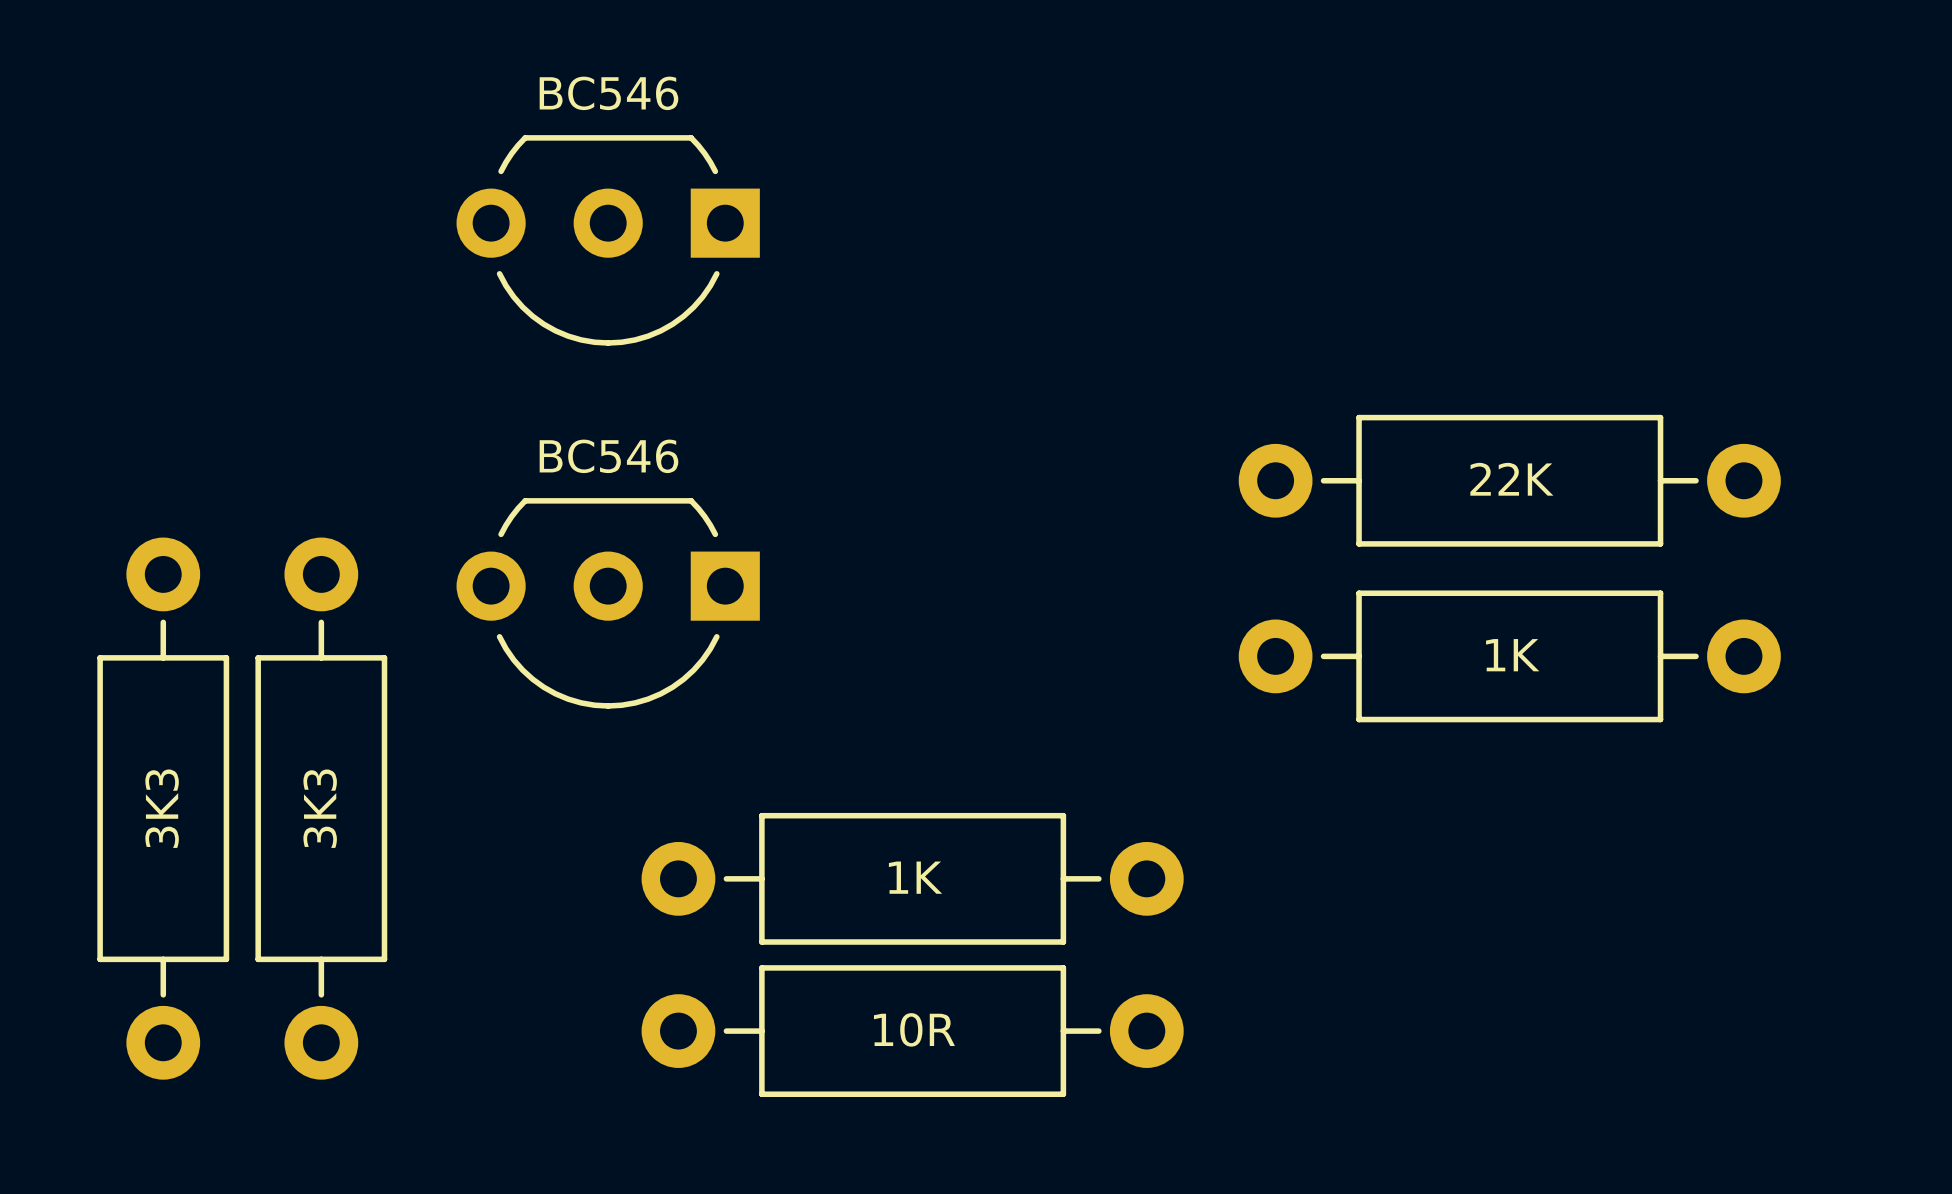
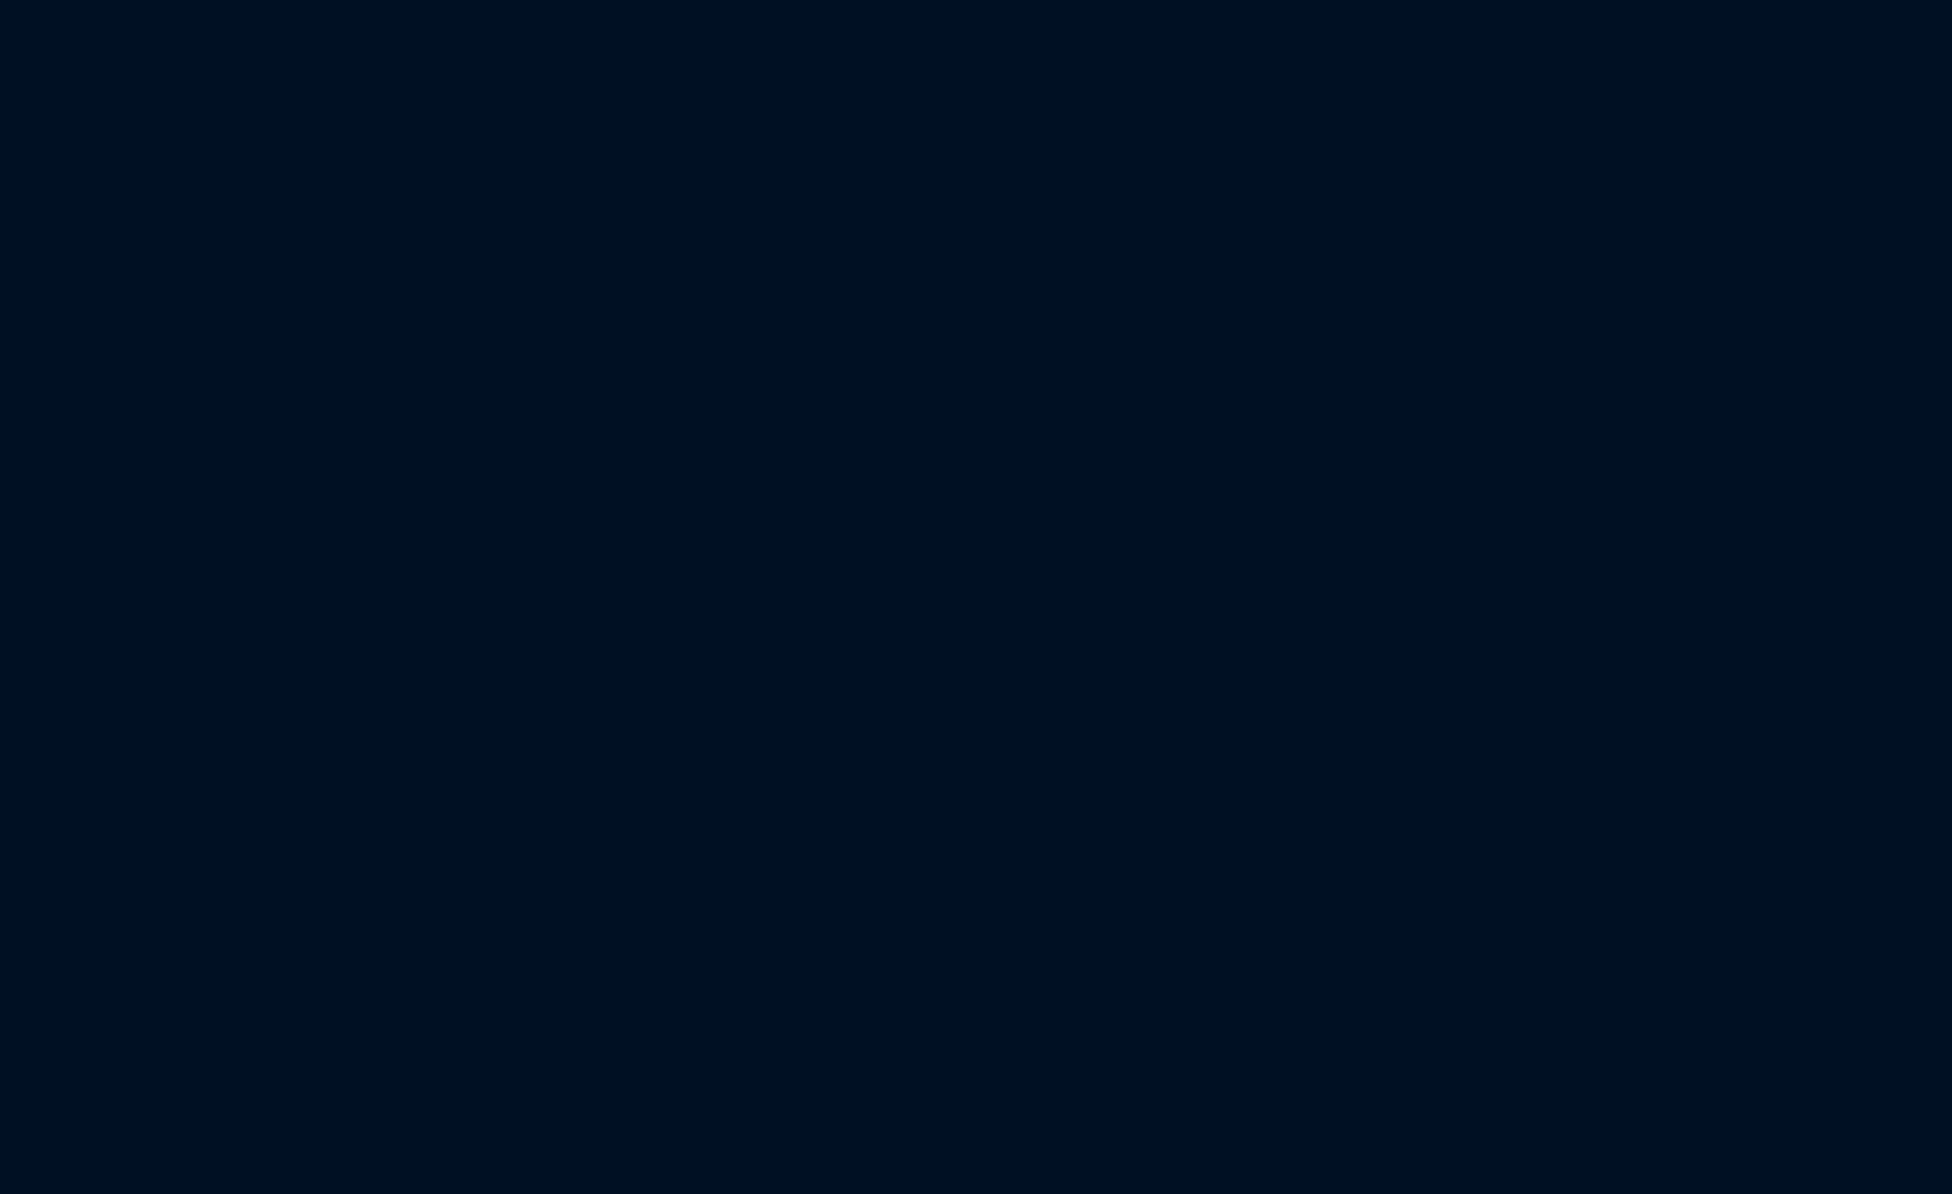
part: BC546 (608, 240) -> none
part: 22K (1509, 480) -> none
part: BC546 (608, 603) -> none
part: 1K (1509, 656) -> none
part: 3K3 (163, 808) -> none
part: 3K3 (321, 808) -> none
part: 1K (912, 878) -> none
part: 10R (912, 1031) -> none

